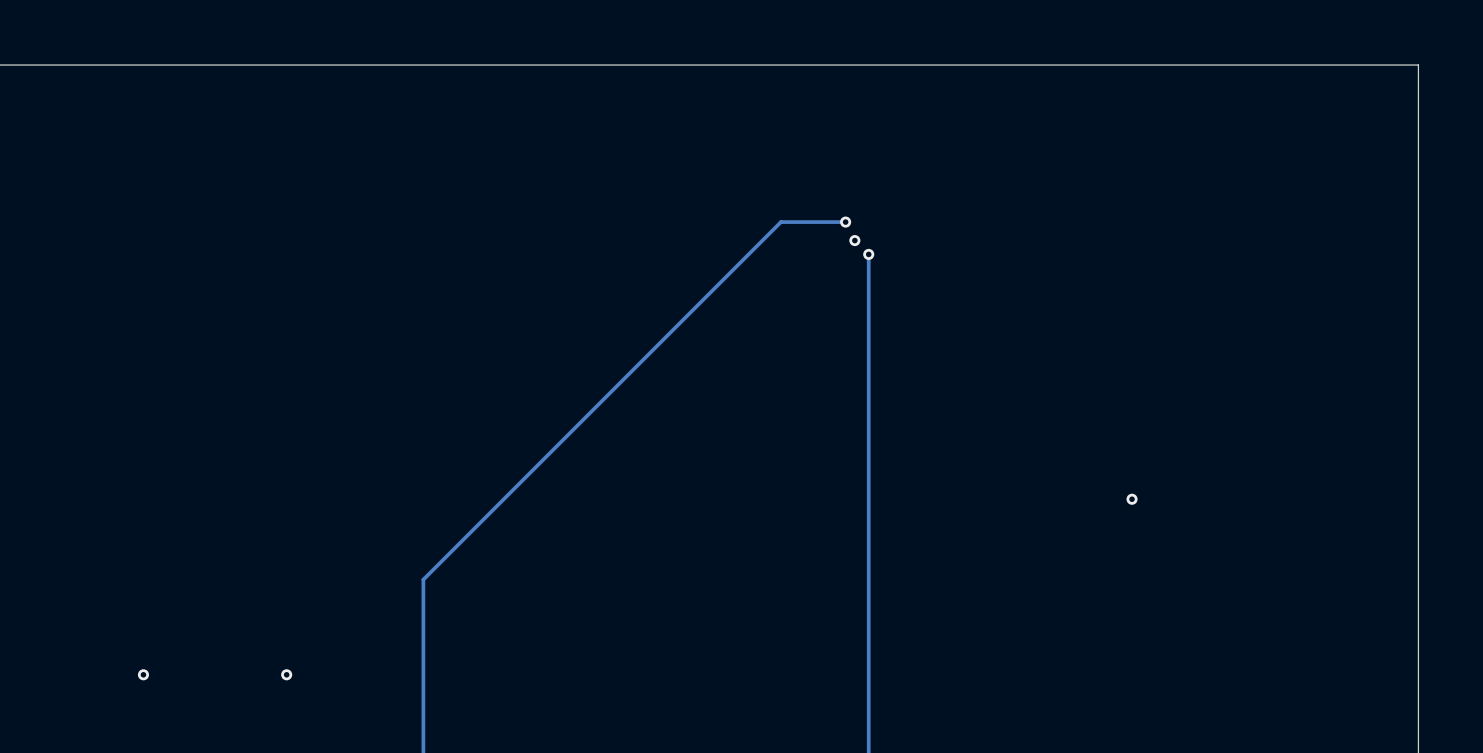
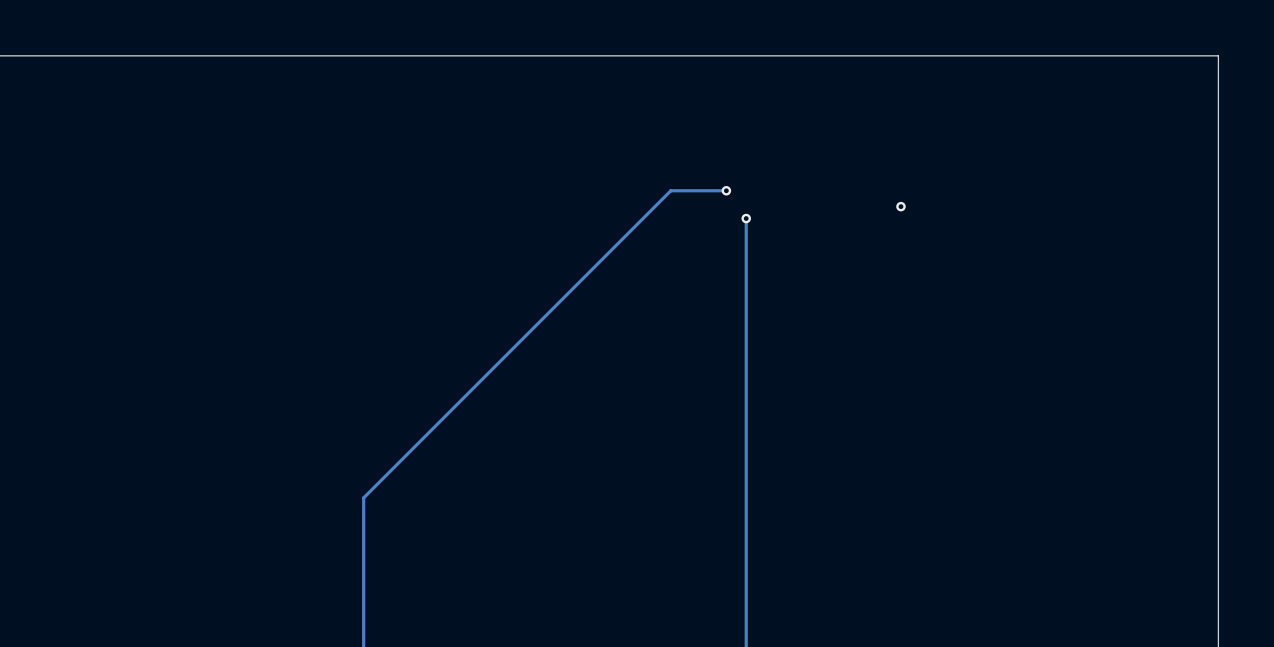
via: (854, 240) -> none
via: none -> (900, 206)
via: (1132, 499) -> none
via: (143, 674) -> none
via: (286, 674) -> none

